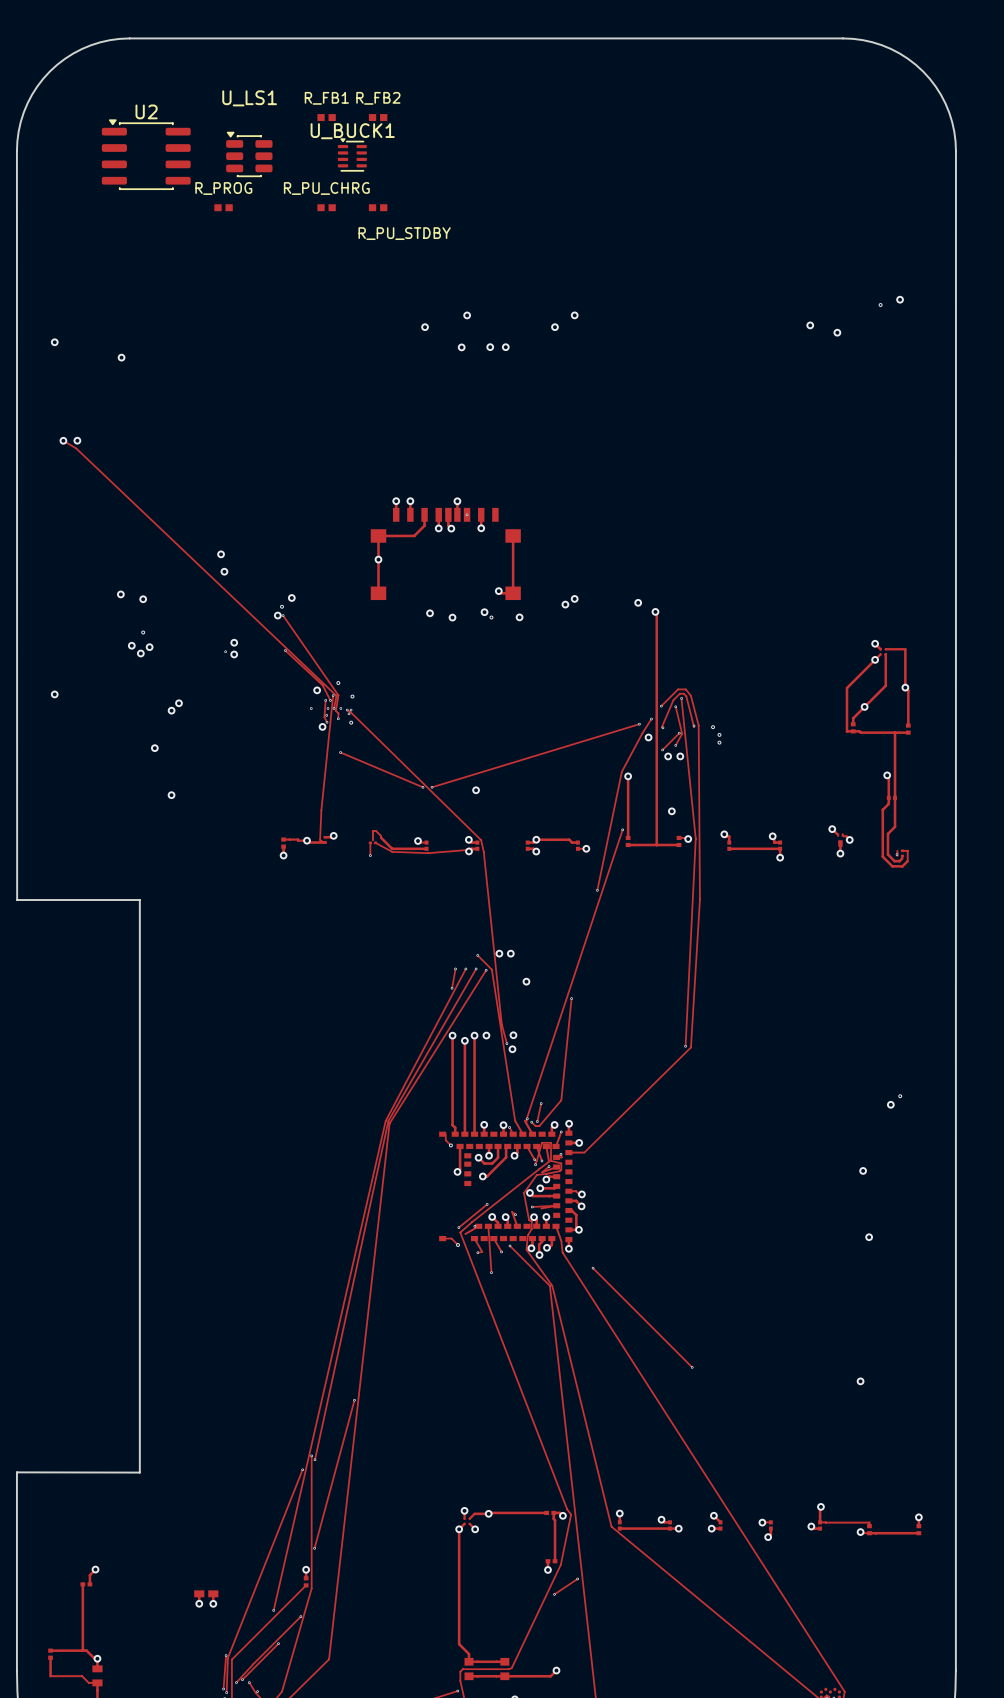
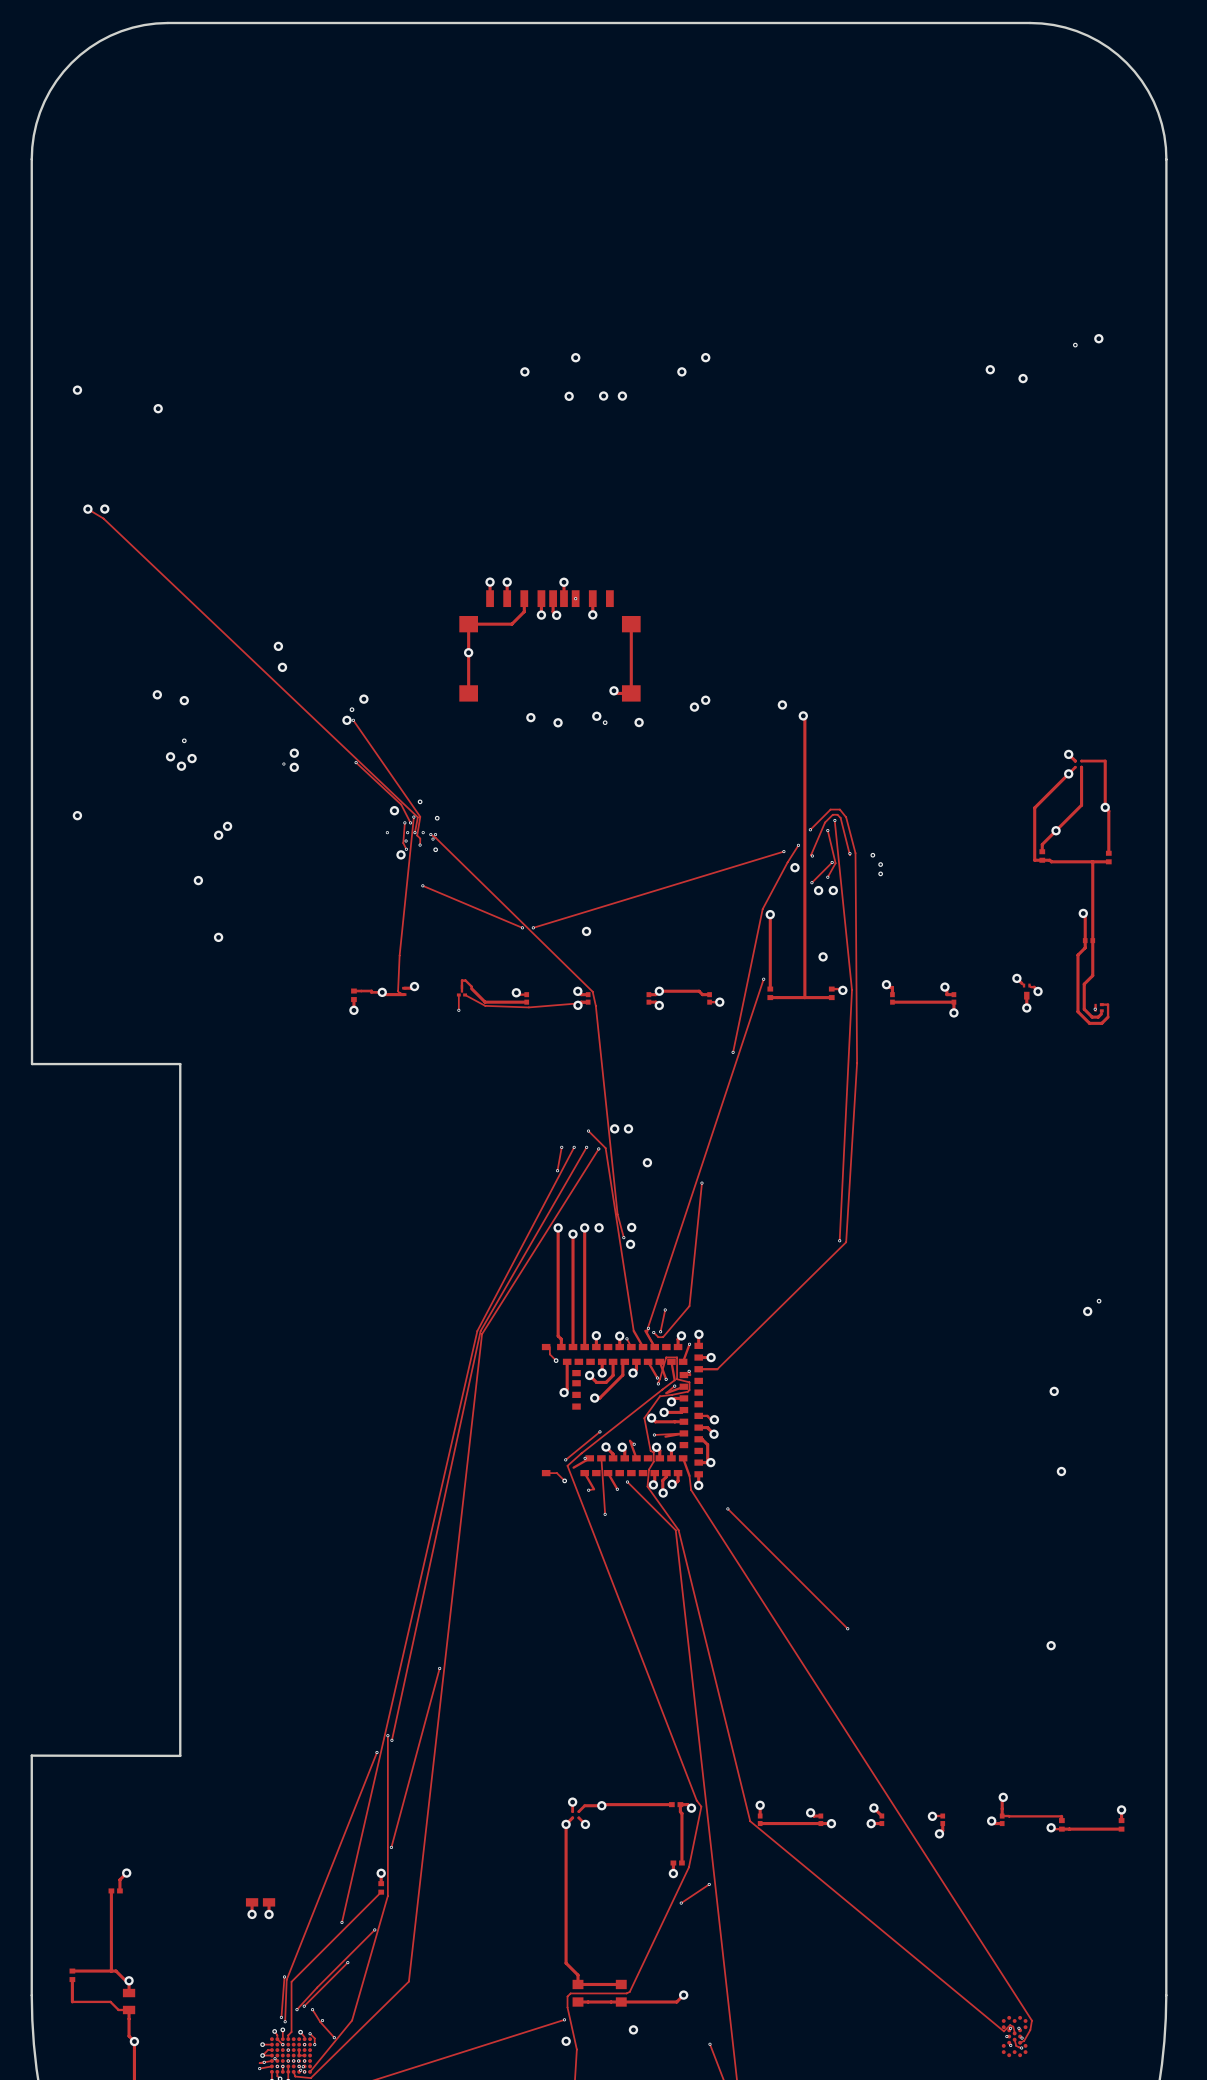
R_FB1: (326, 117) -> none
R_FB2: (378, 117) -> none
U2: (146, 154) -> none
U_LS1: (249, 154) -> none
U_BUCK1: (352, 154) -> none
R_PROG: (223, 207) -> none
R_PU_CHRG: (326, 207) -> none
R_PU_STDBY: (378, 207) -> none

